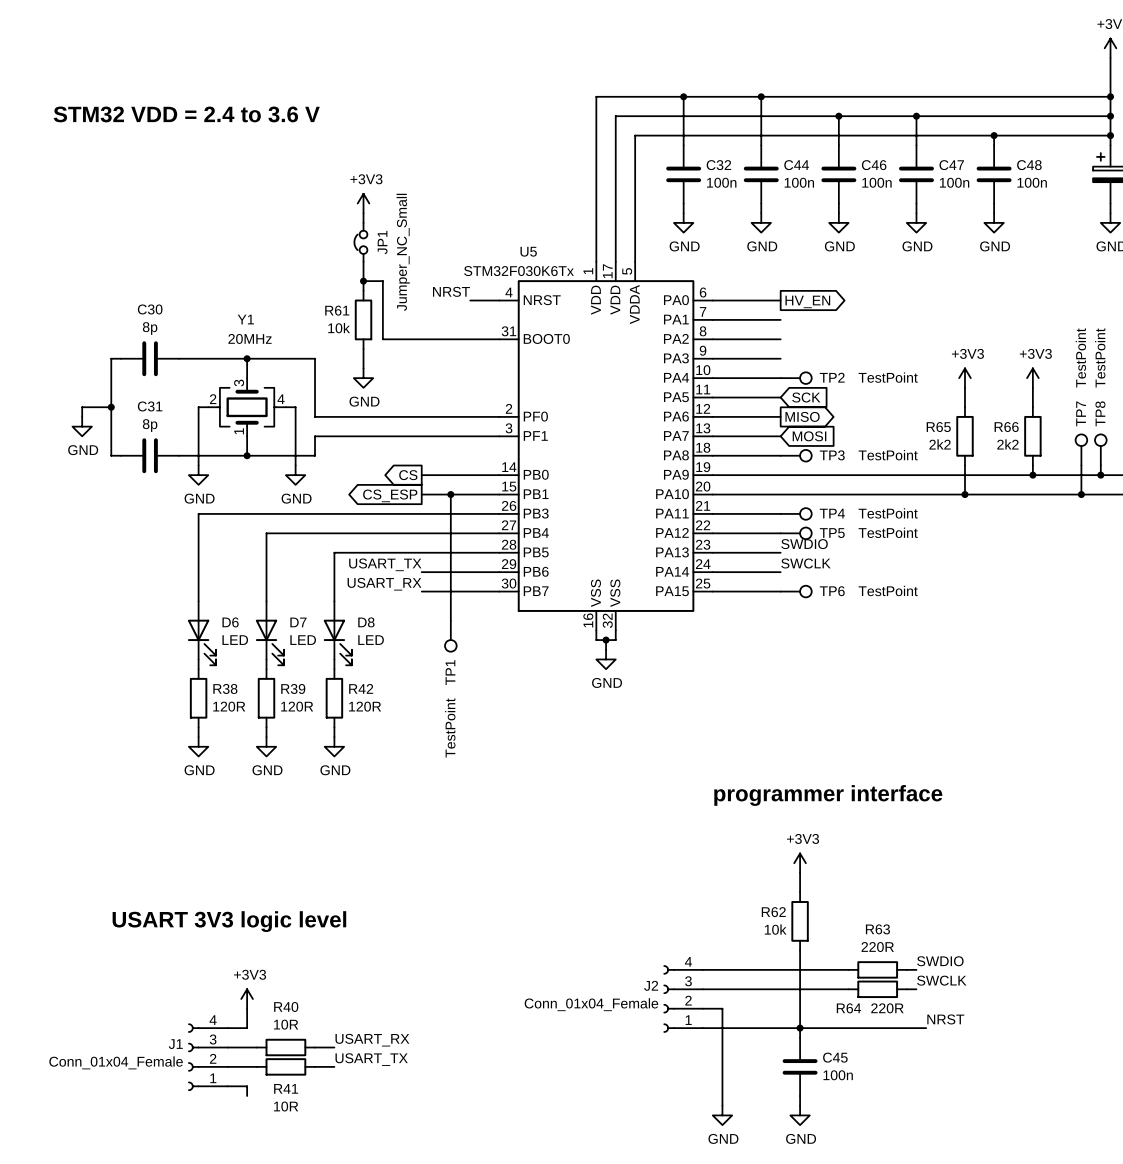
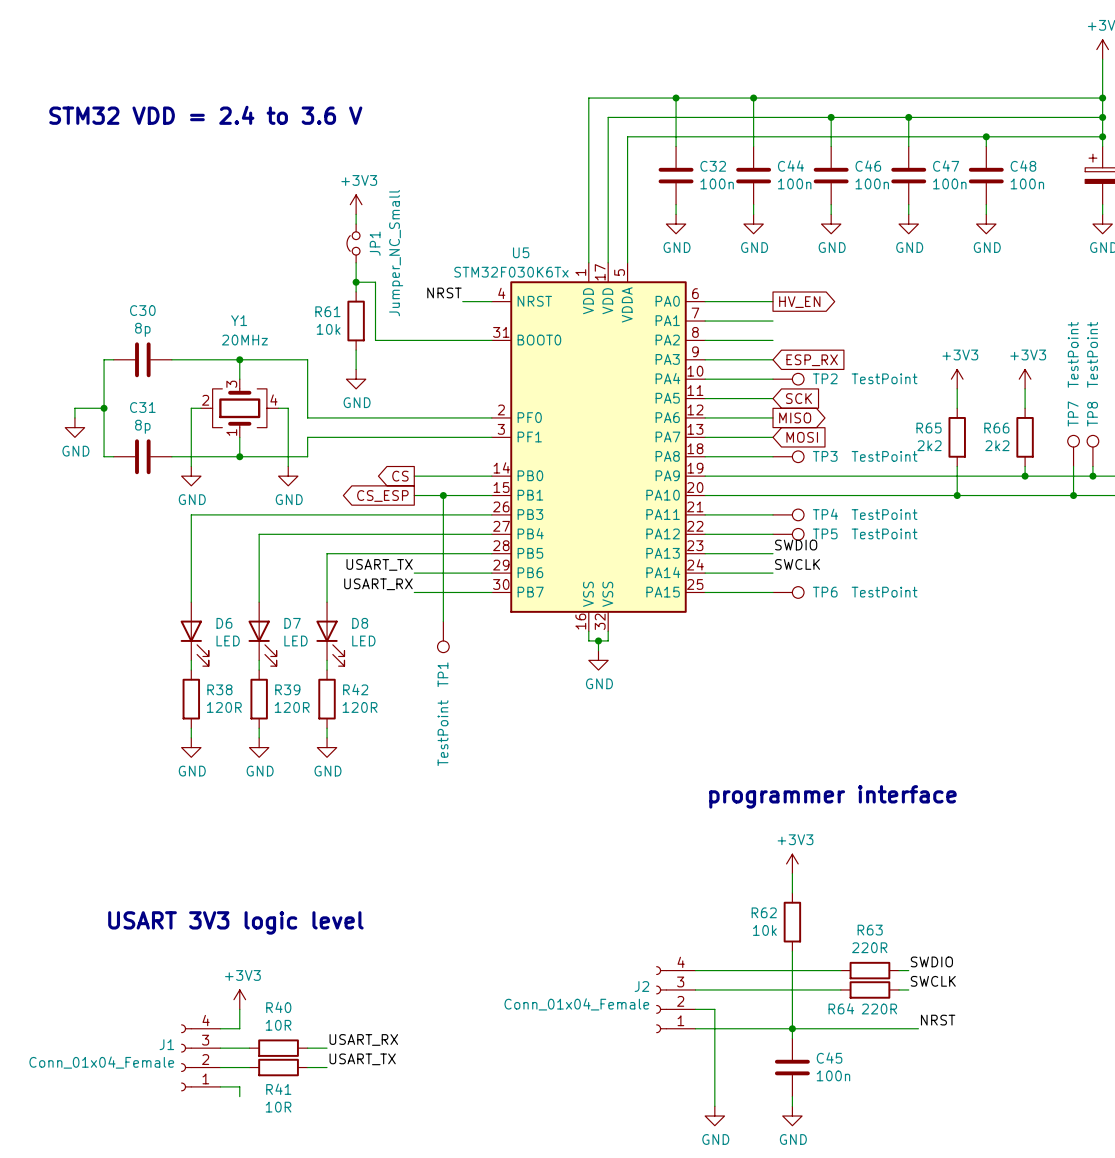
global label: none -> ESP_RX (812, 360)

